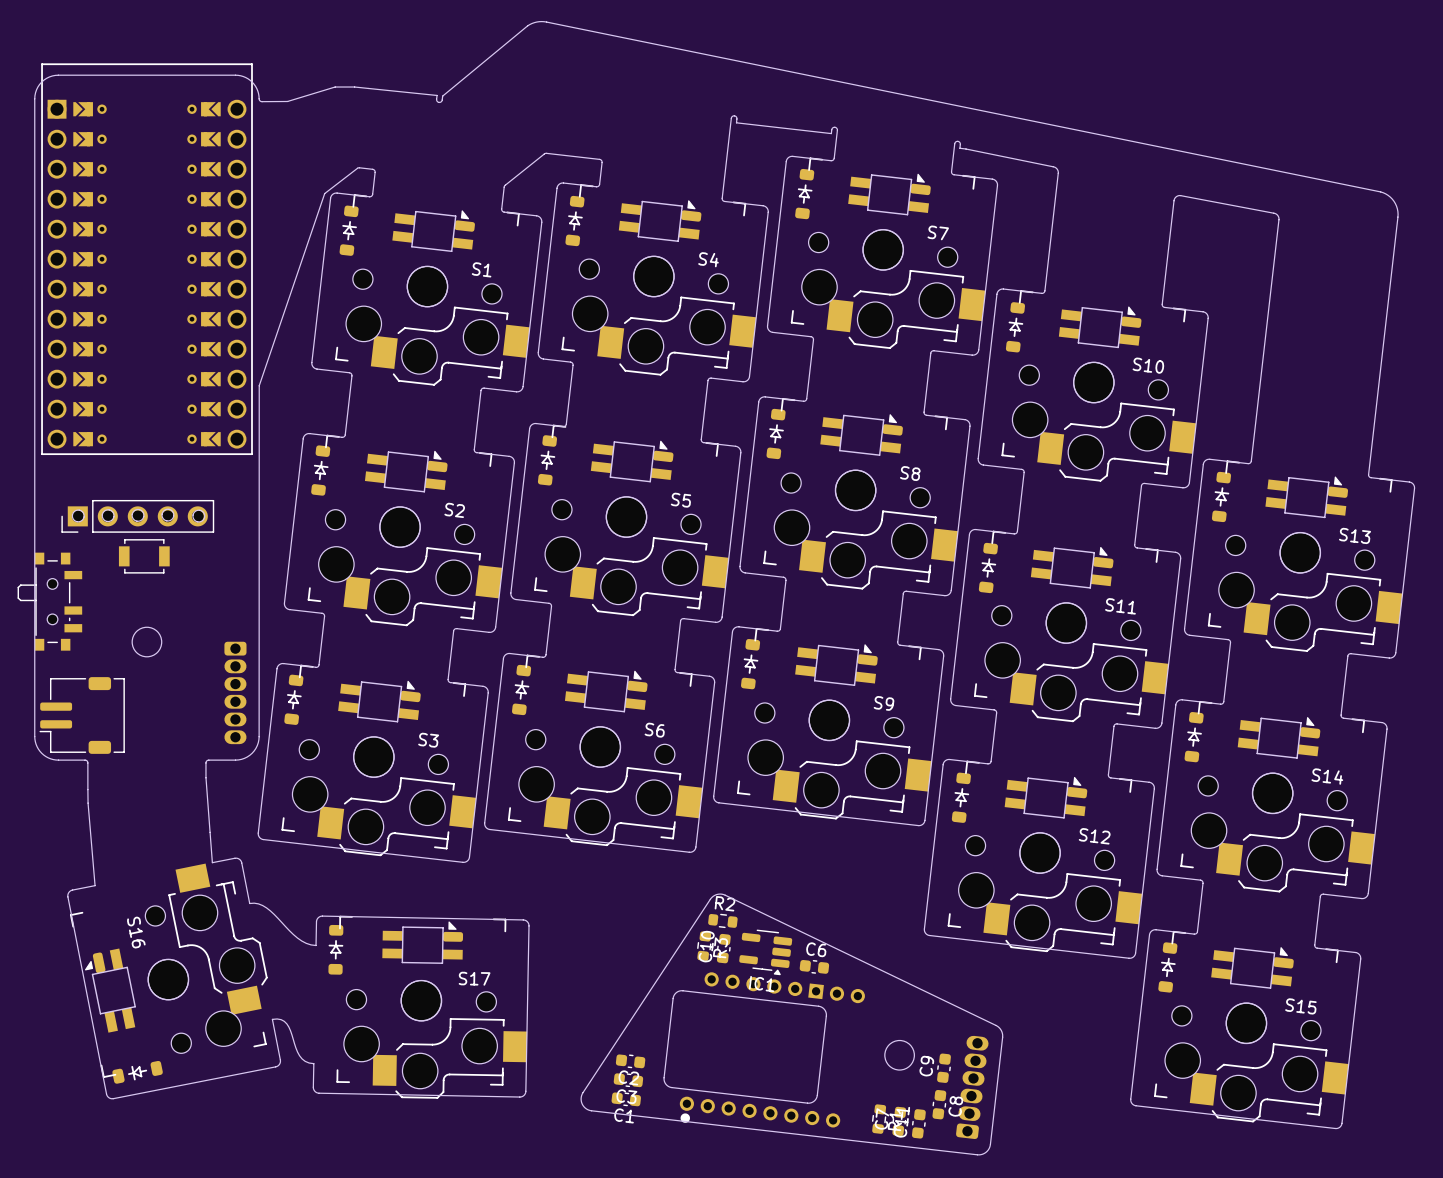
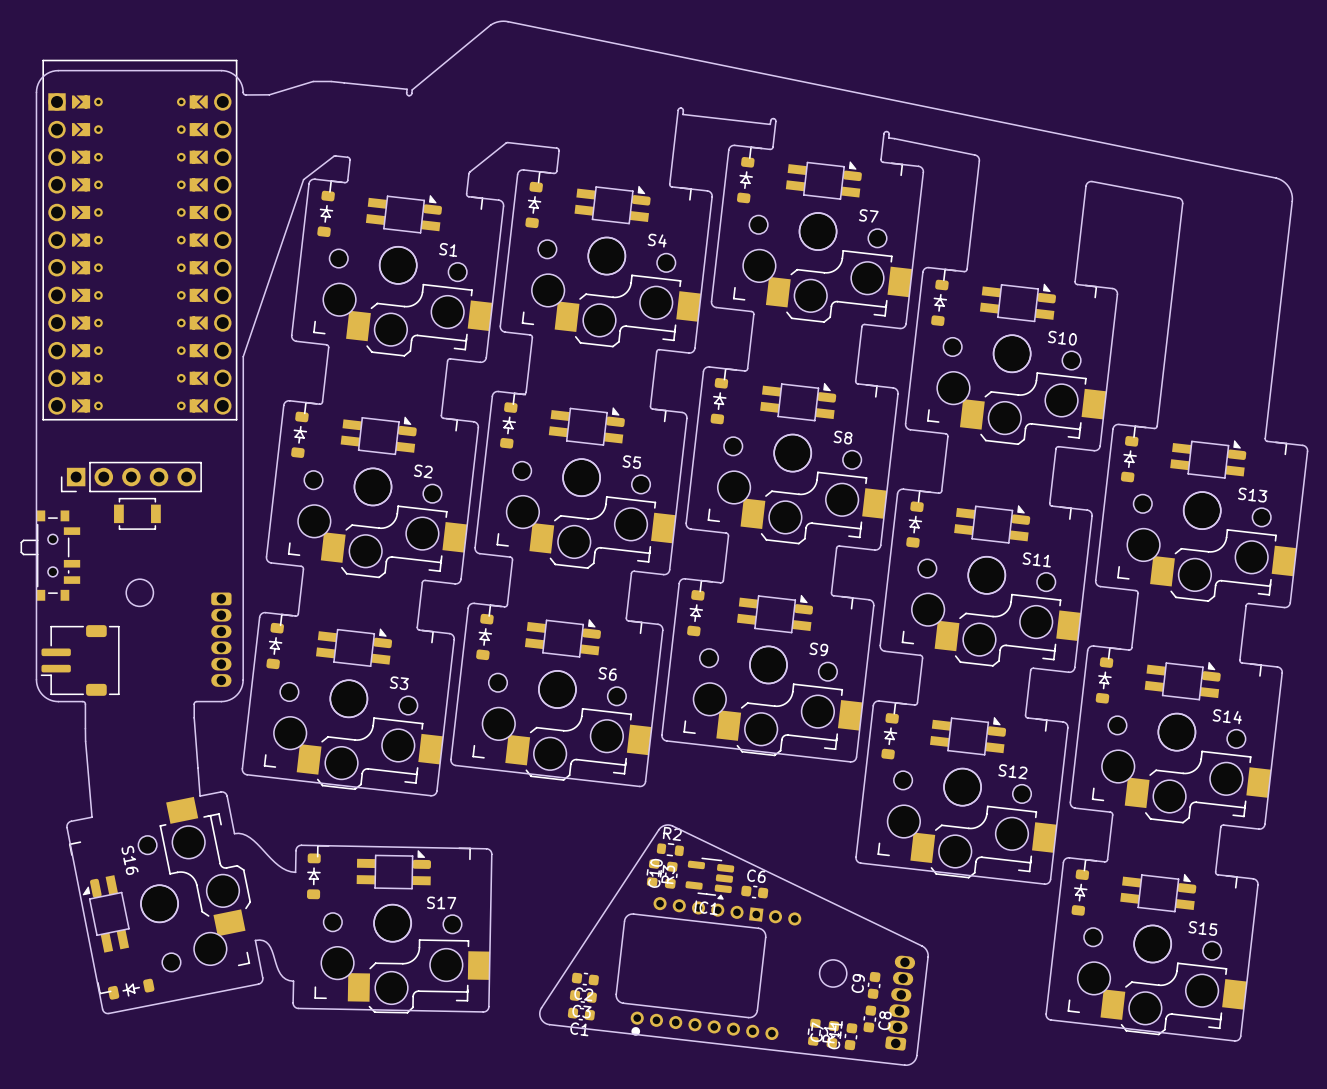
board edge: (109, 509) (113, 512) (113, 516) (111, 520) (107, 521) (103, 518) (102, 514) (104, 510) (109, 509) -> none
board edge: (139, 509) (134, 510) (132, 514) (133, 518) (136, 521) (141, 520) (143, 516) (142, 512) (139, 509) -> none
board edge: (169, 509) (164, 510) (162, 514) (163, 518) (166, 520) (171, 519) (173, 516) (172, 511) (169, 509) -> none
board edge: (79, 510) (74, 511) (72, 514) (73, 519) (77, 521) (81, 520) (84, 516) (83, 512) (79, 510) -> none
board edge: (199, 510) (203, 512) (204, 517) (202, 520) (197, 521) (193, 519) (193, 515) (195, 511) (199, 510) -> none

